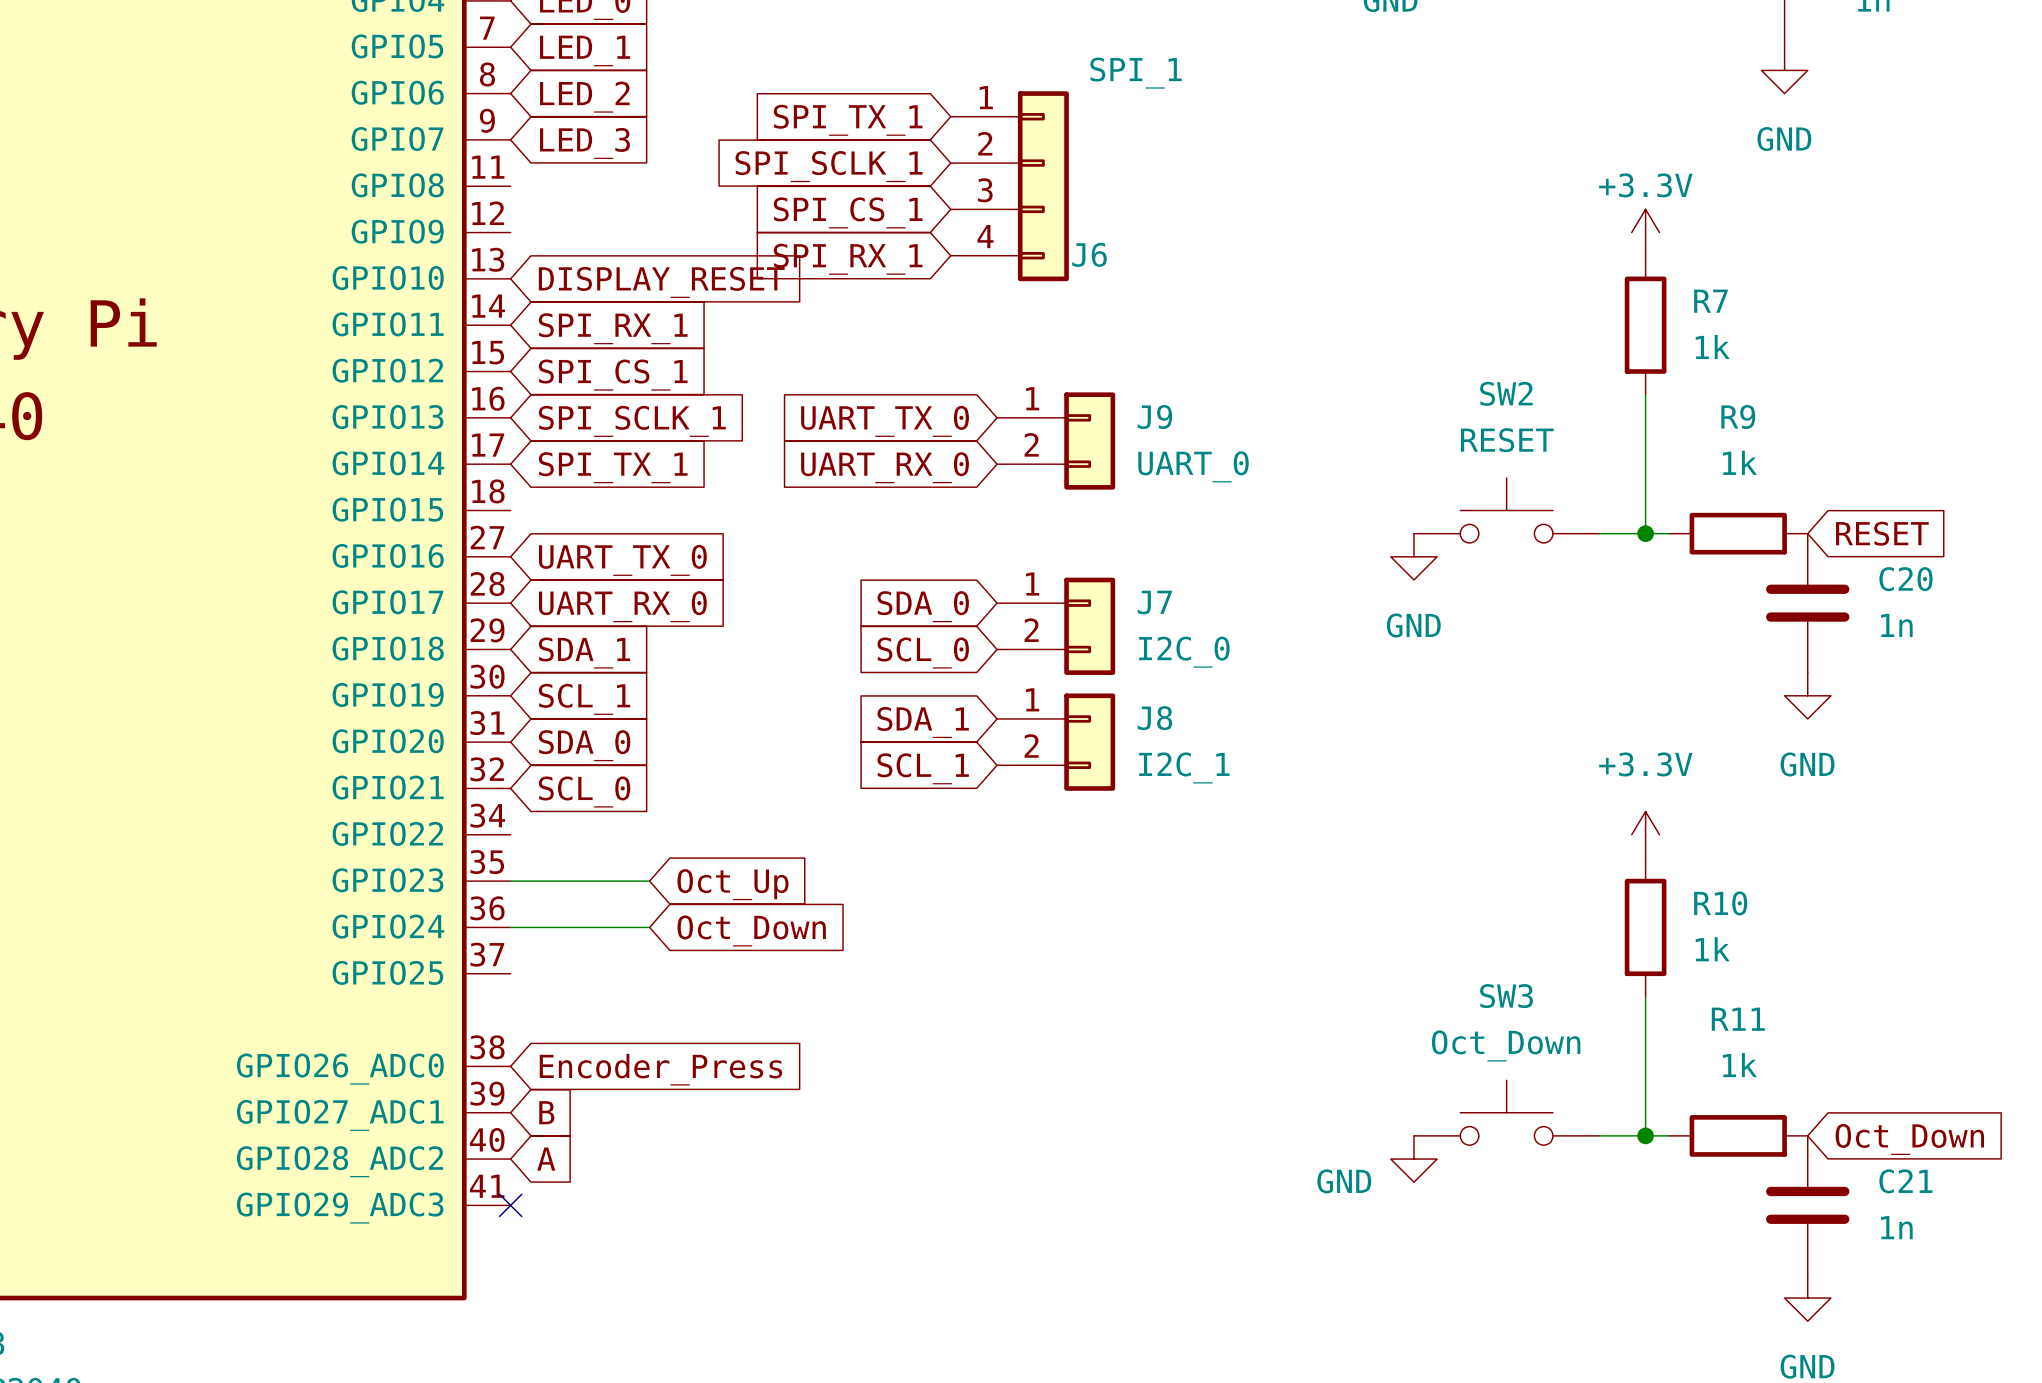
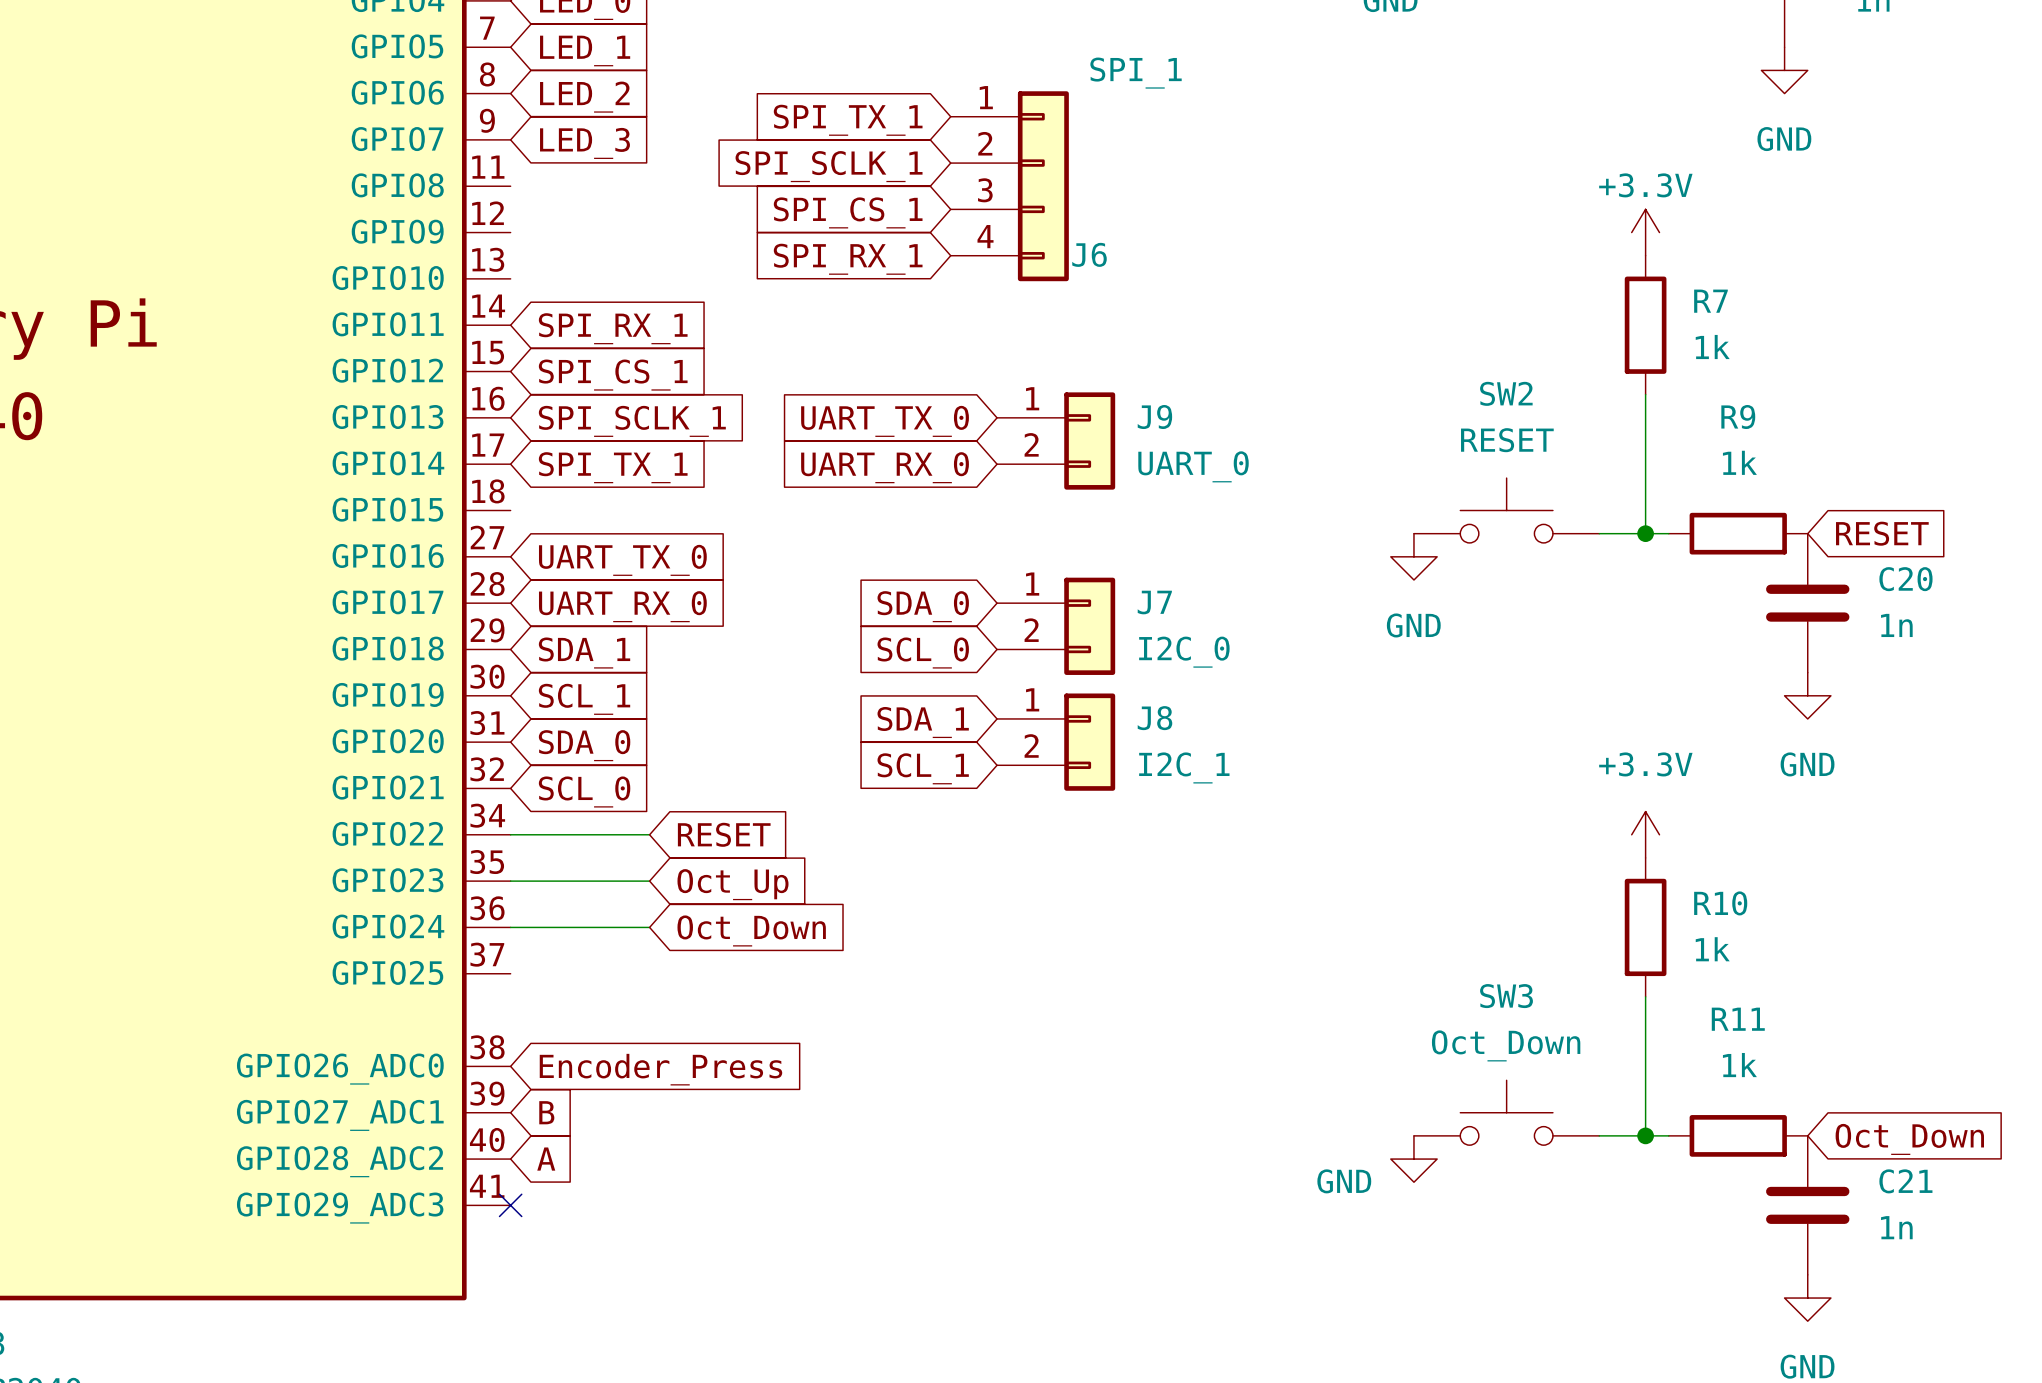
global label: DISPLAY_RESET (661, 282) -> none
wire: none -> (510, 834) (649, 834)
global label: none -> RESET (724, 834)

